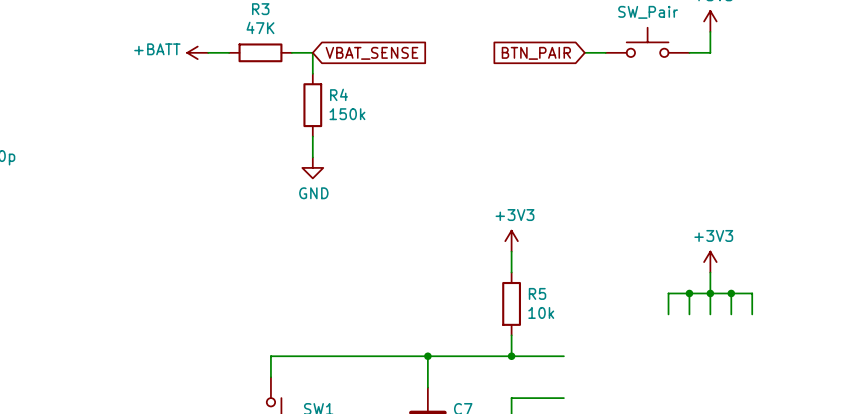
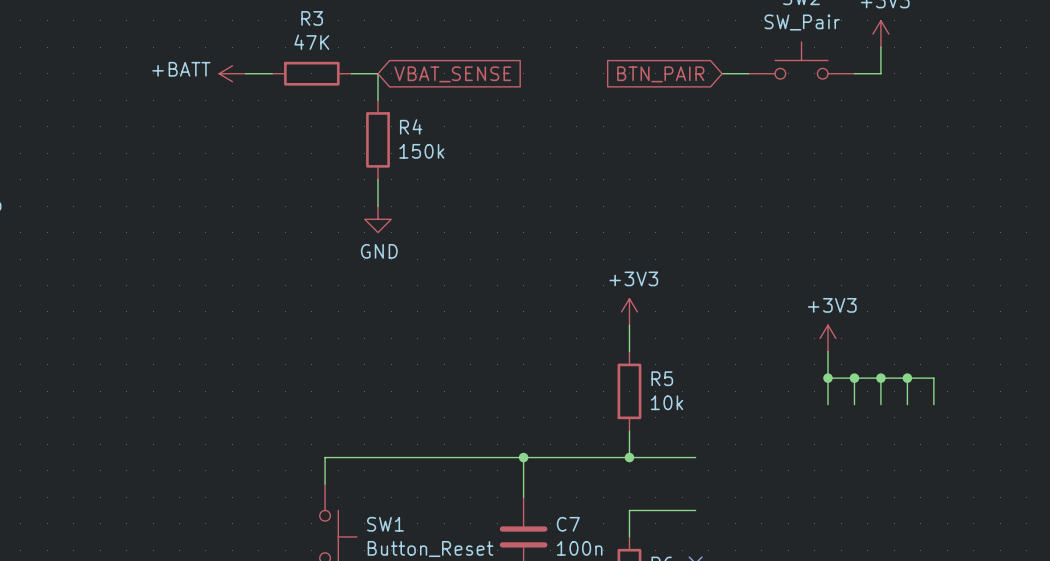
power symbol position: +3V3 (710, 262) -> +3V3 (827, 338)
wire: (710, 272) (710, 293) -> (827, 351) (827, 378)
junction: none -> (827, 378)

